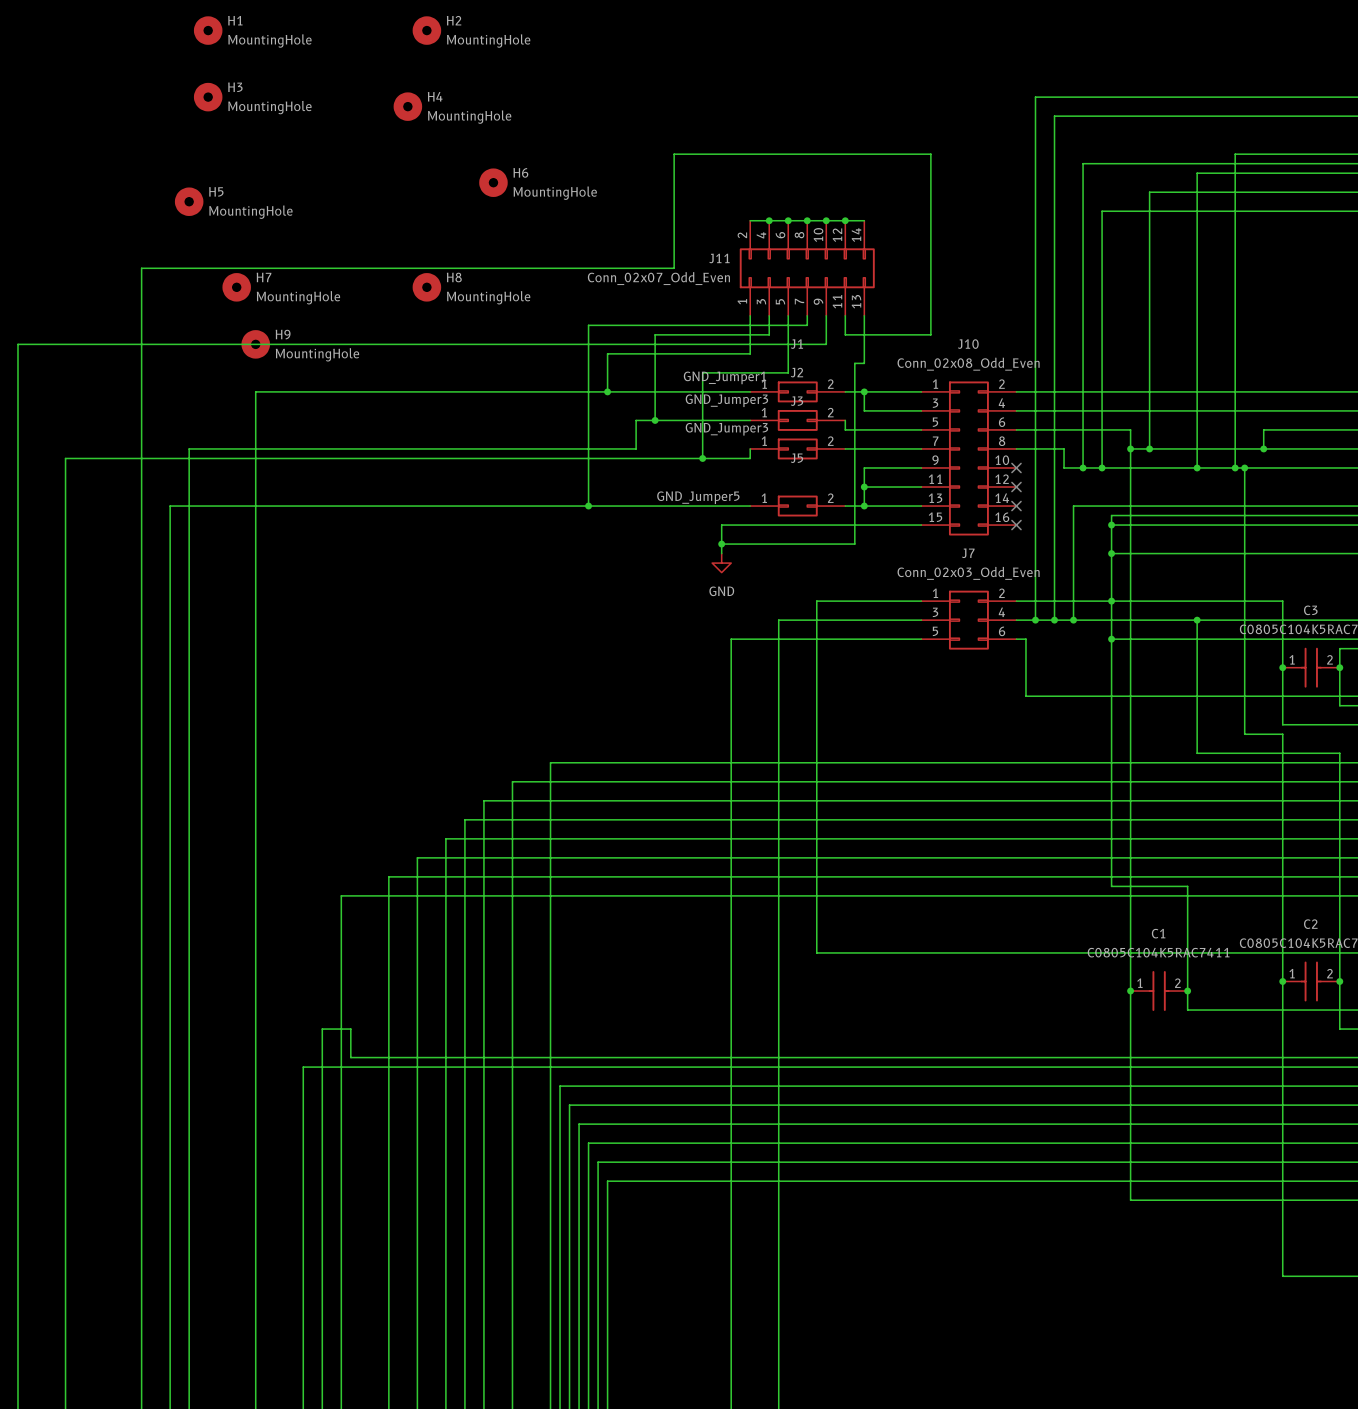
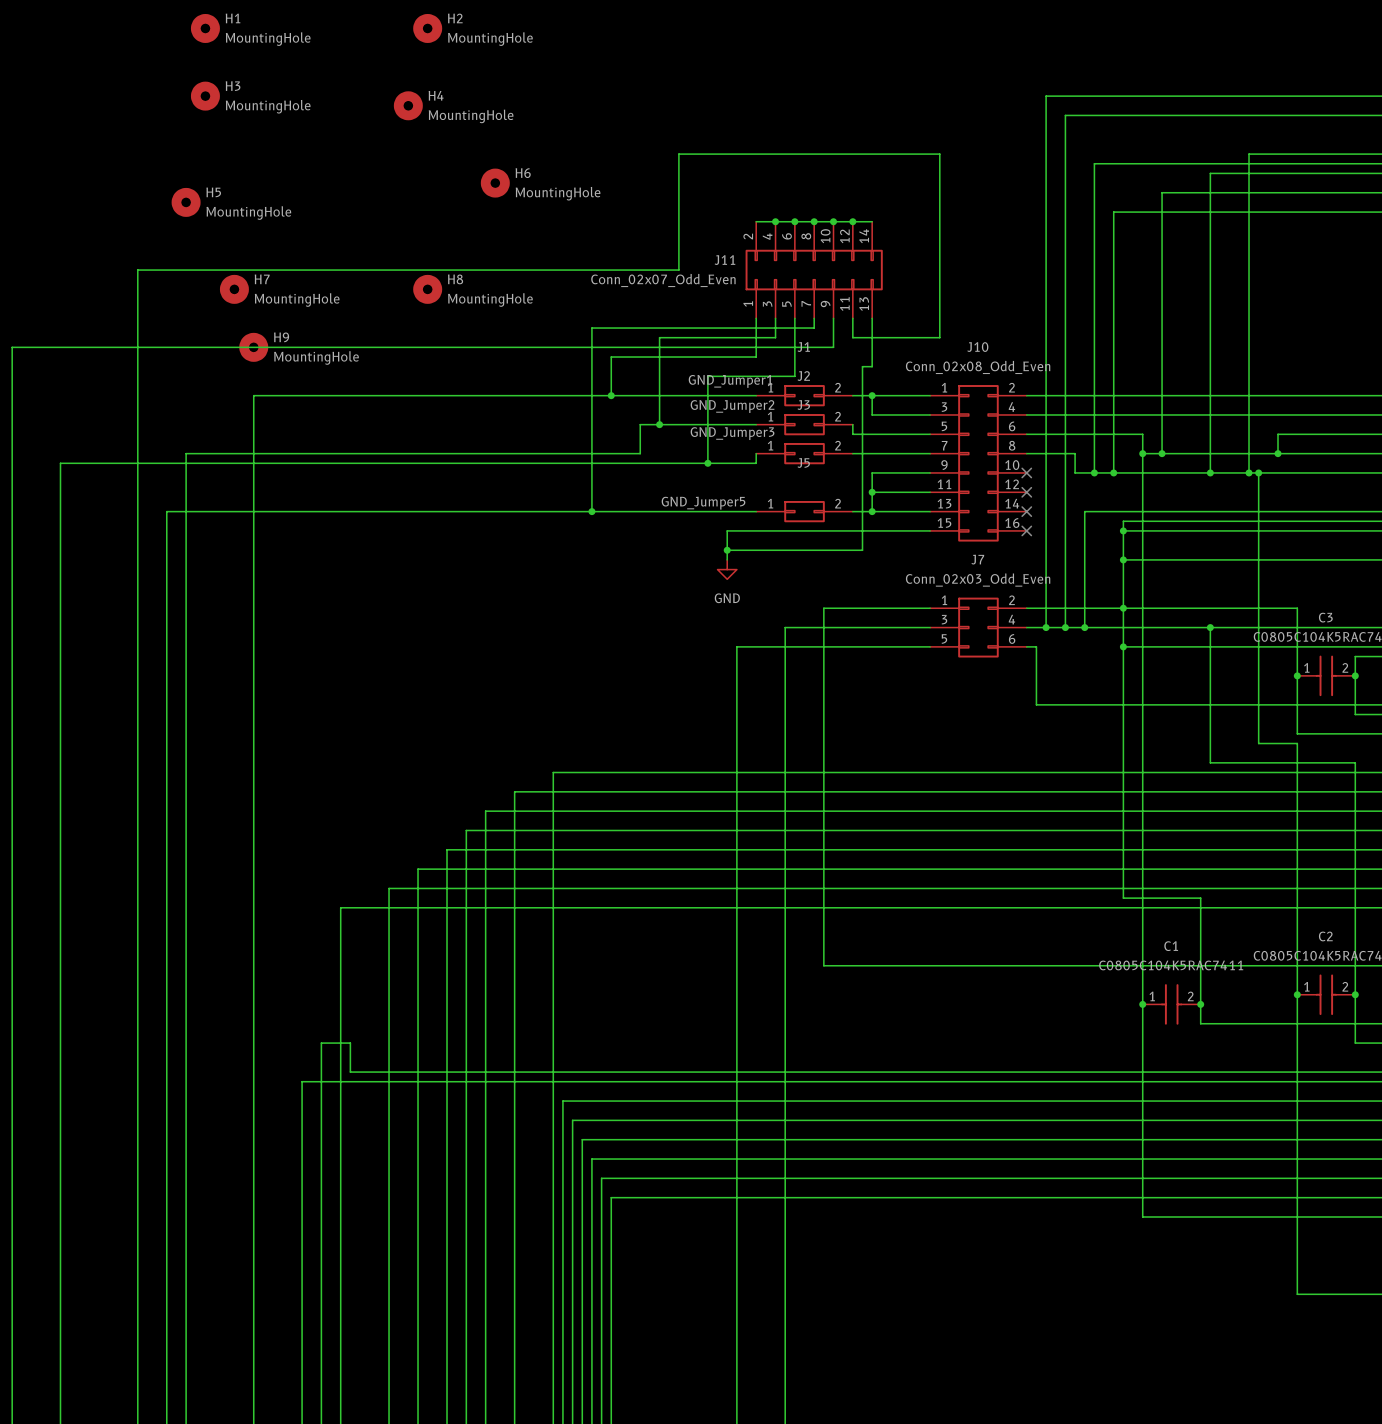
J2 value: GND_Jumper3 (726, 400) -> GND_Jumper2 (732, 406)

